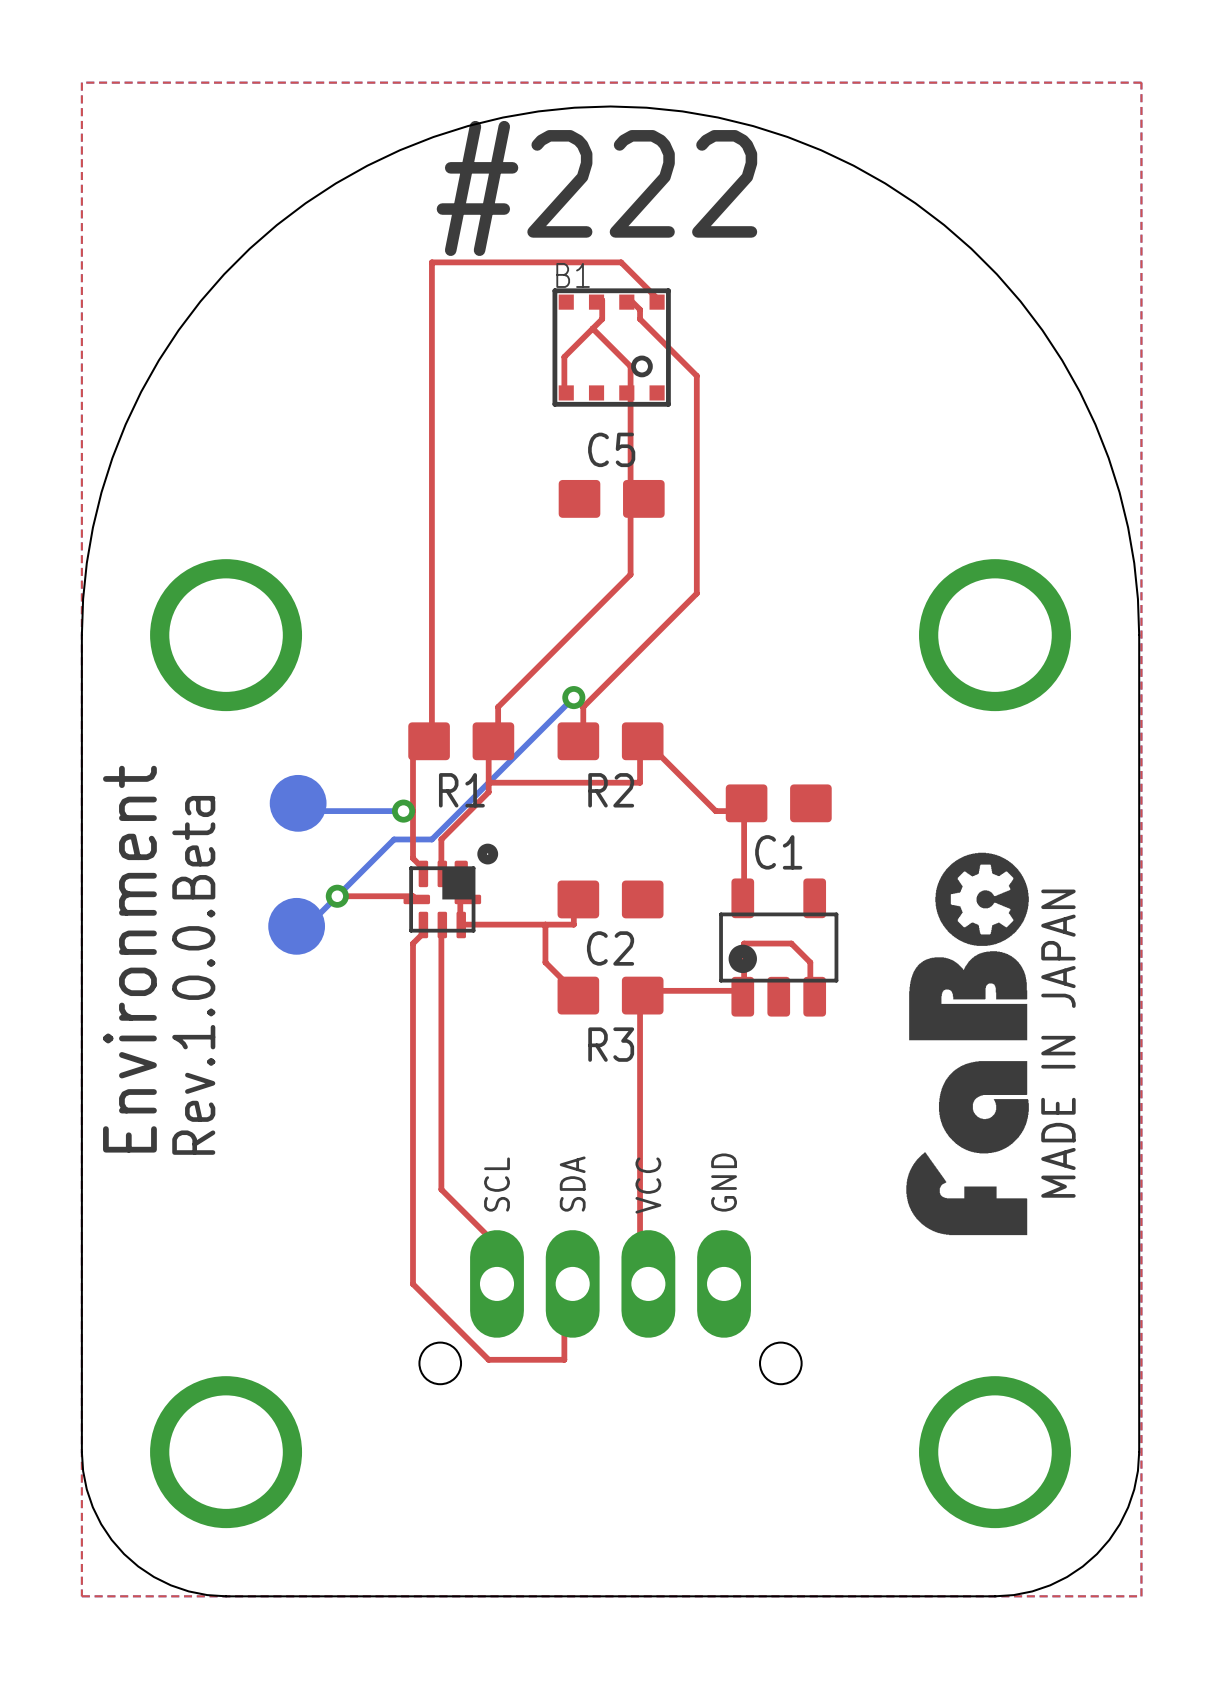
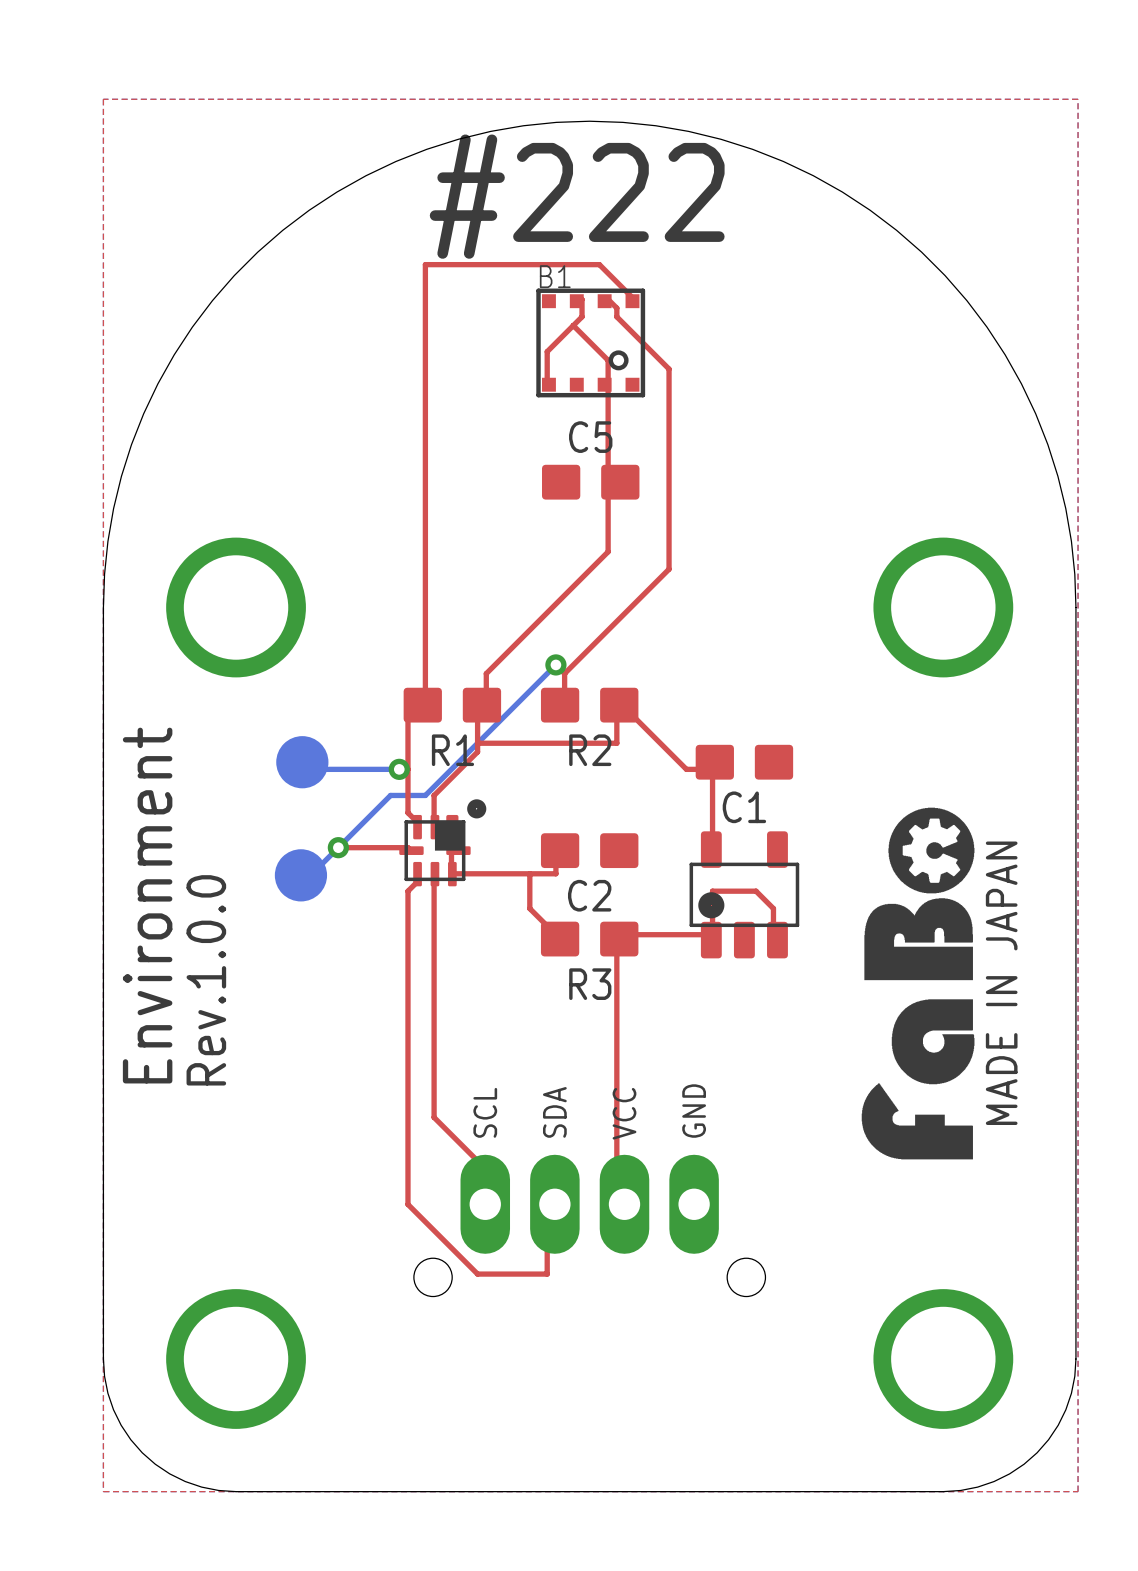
text: Rev.1.0.0.Beta (193, 975) -> Rev.1.0.0 (206, 980)

